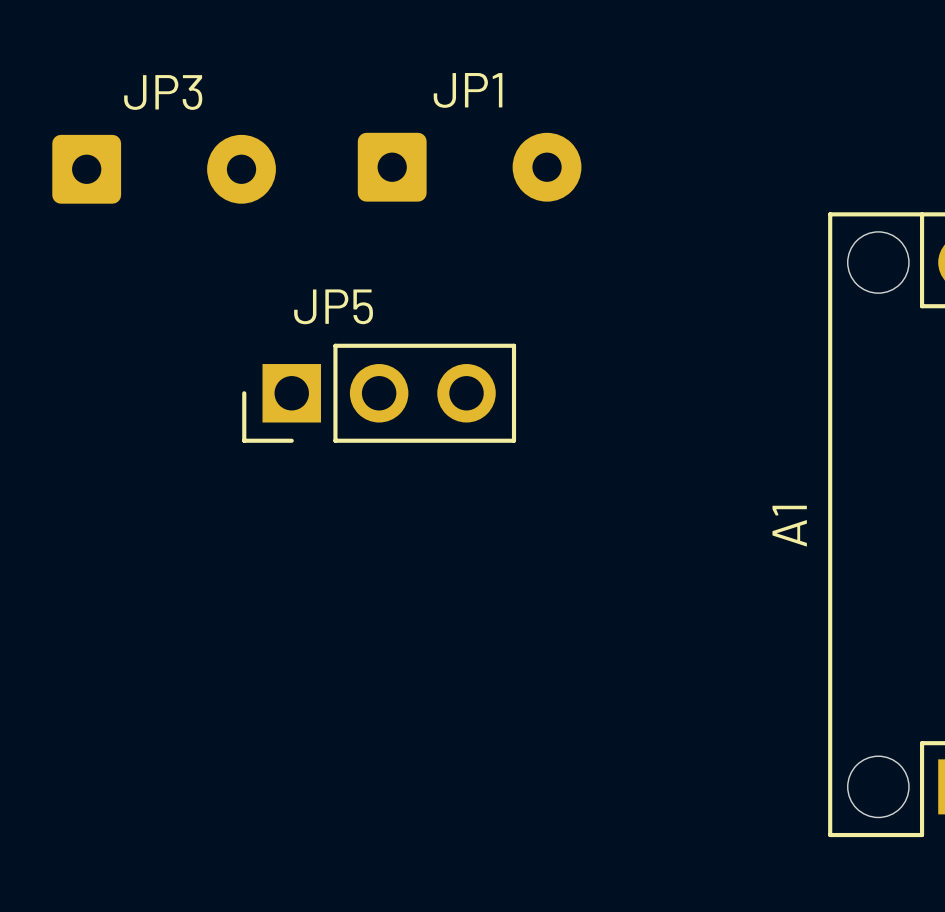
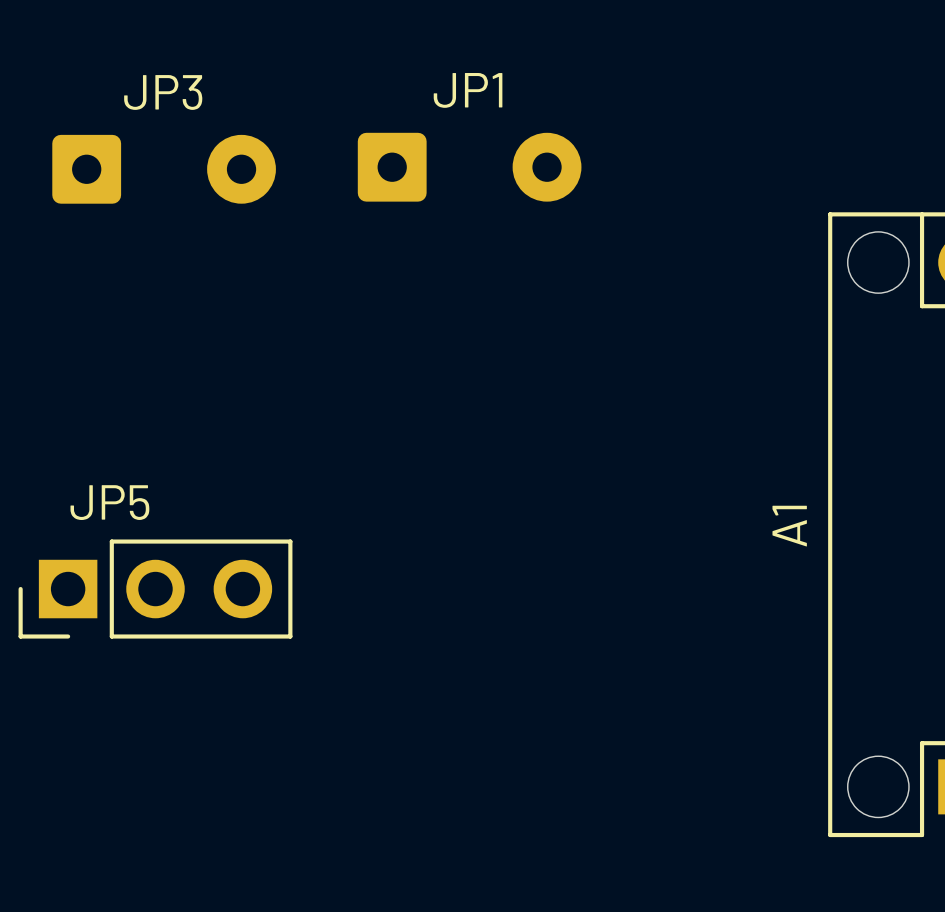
JP5 position: (379, 393) -> (155, 589)

